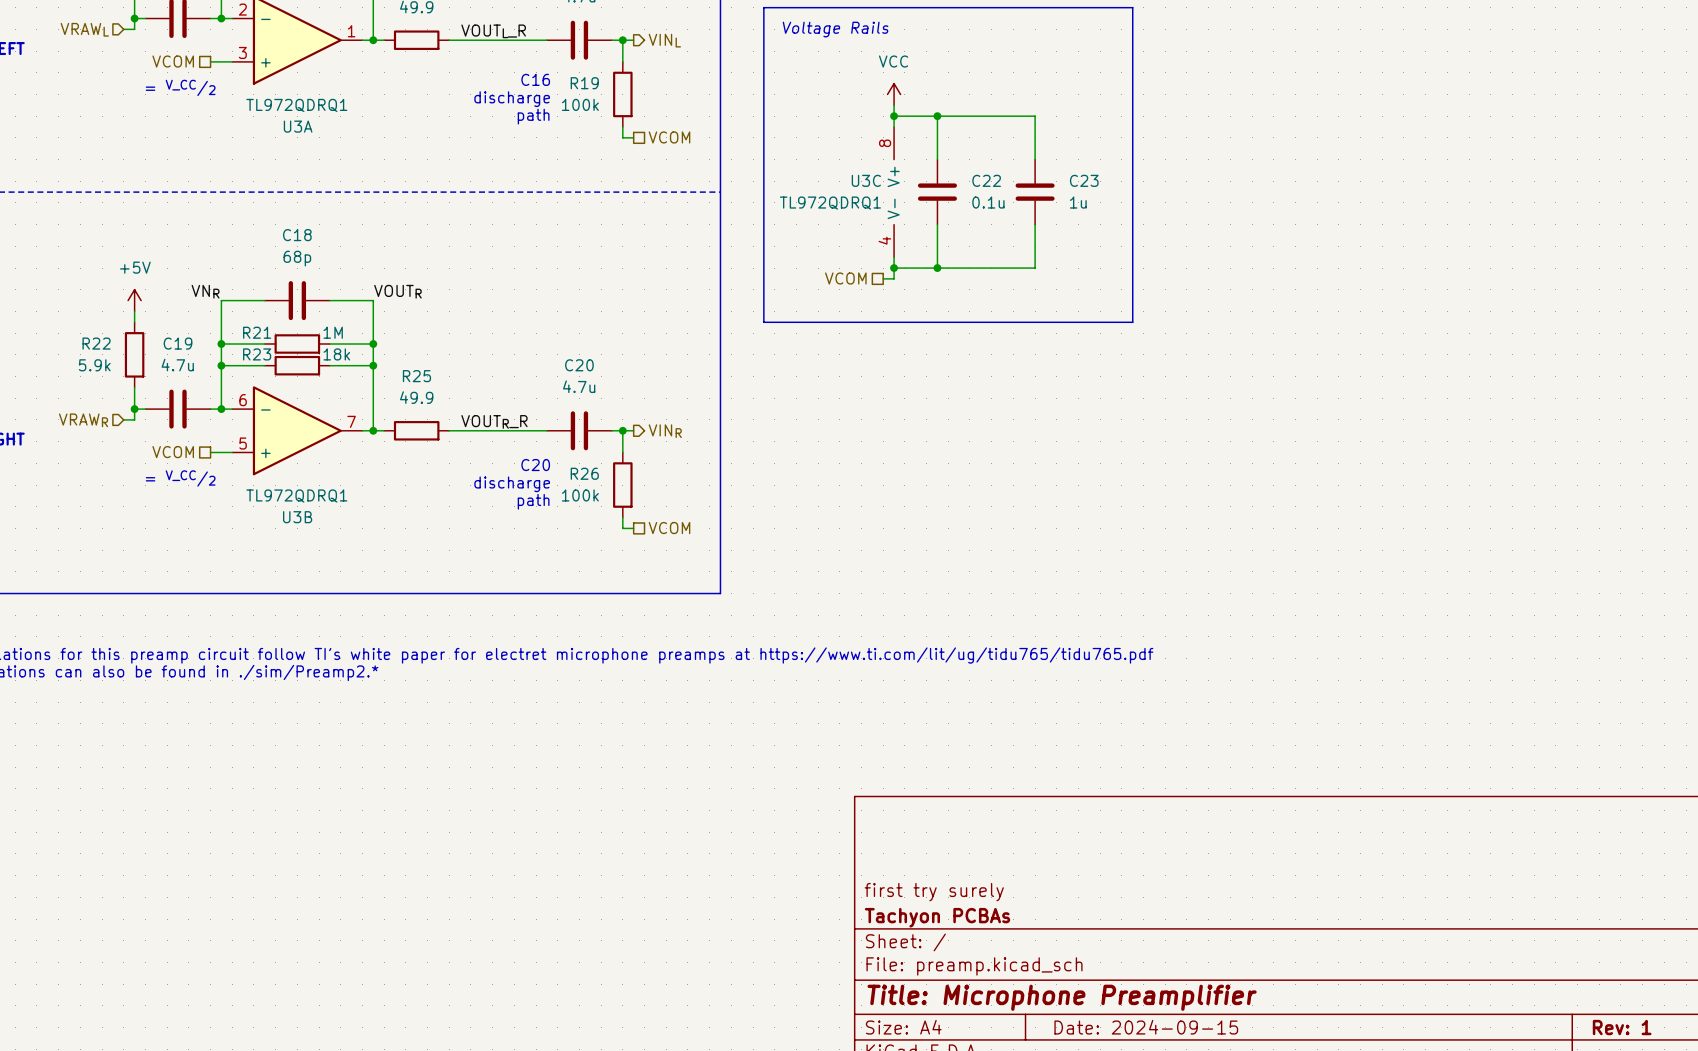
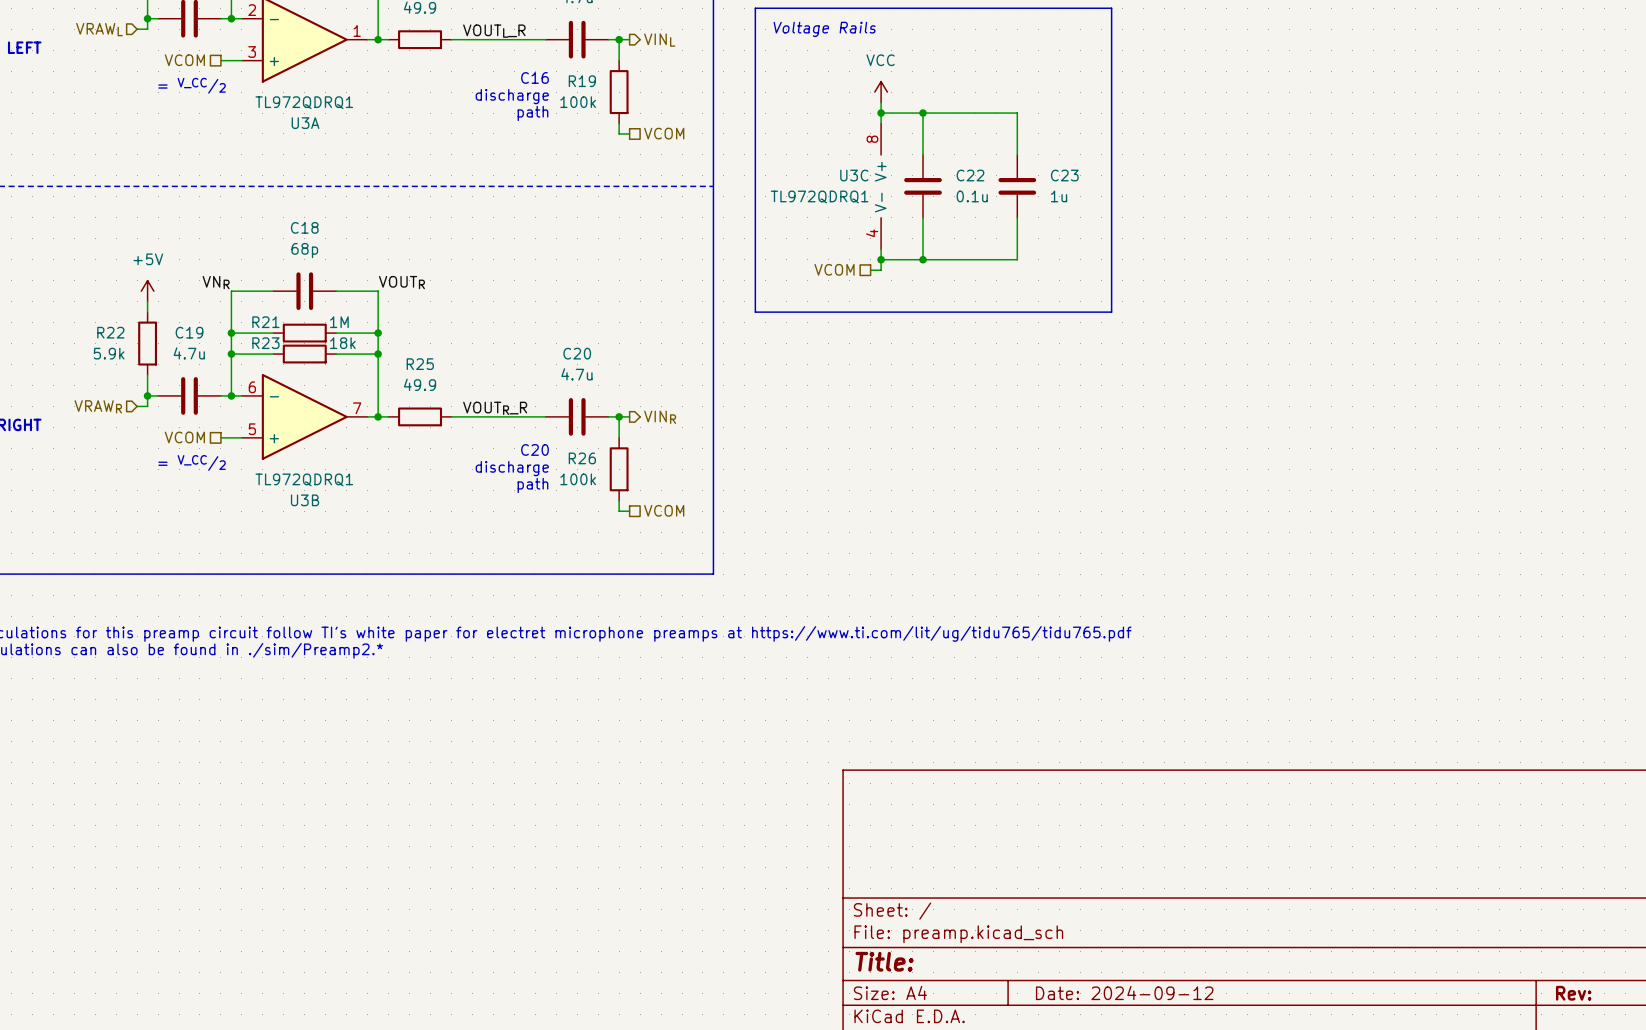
title block: first try surely (934, 892) -> none
title block: Tachyon PCBAs (937, 917) -> none
title block: Title: Microphone Preamplifier (1062, 997) -> Title: (884, 961)
title block: Date: 2024-09-15 (1146, 1027) -> Date: 2024-09-12 (1124, 992)
title block: Rev: 1 (1622, 1027) -> Rev: (1573, 993)

